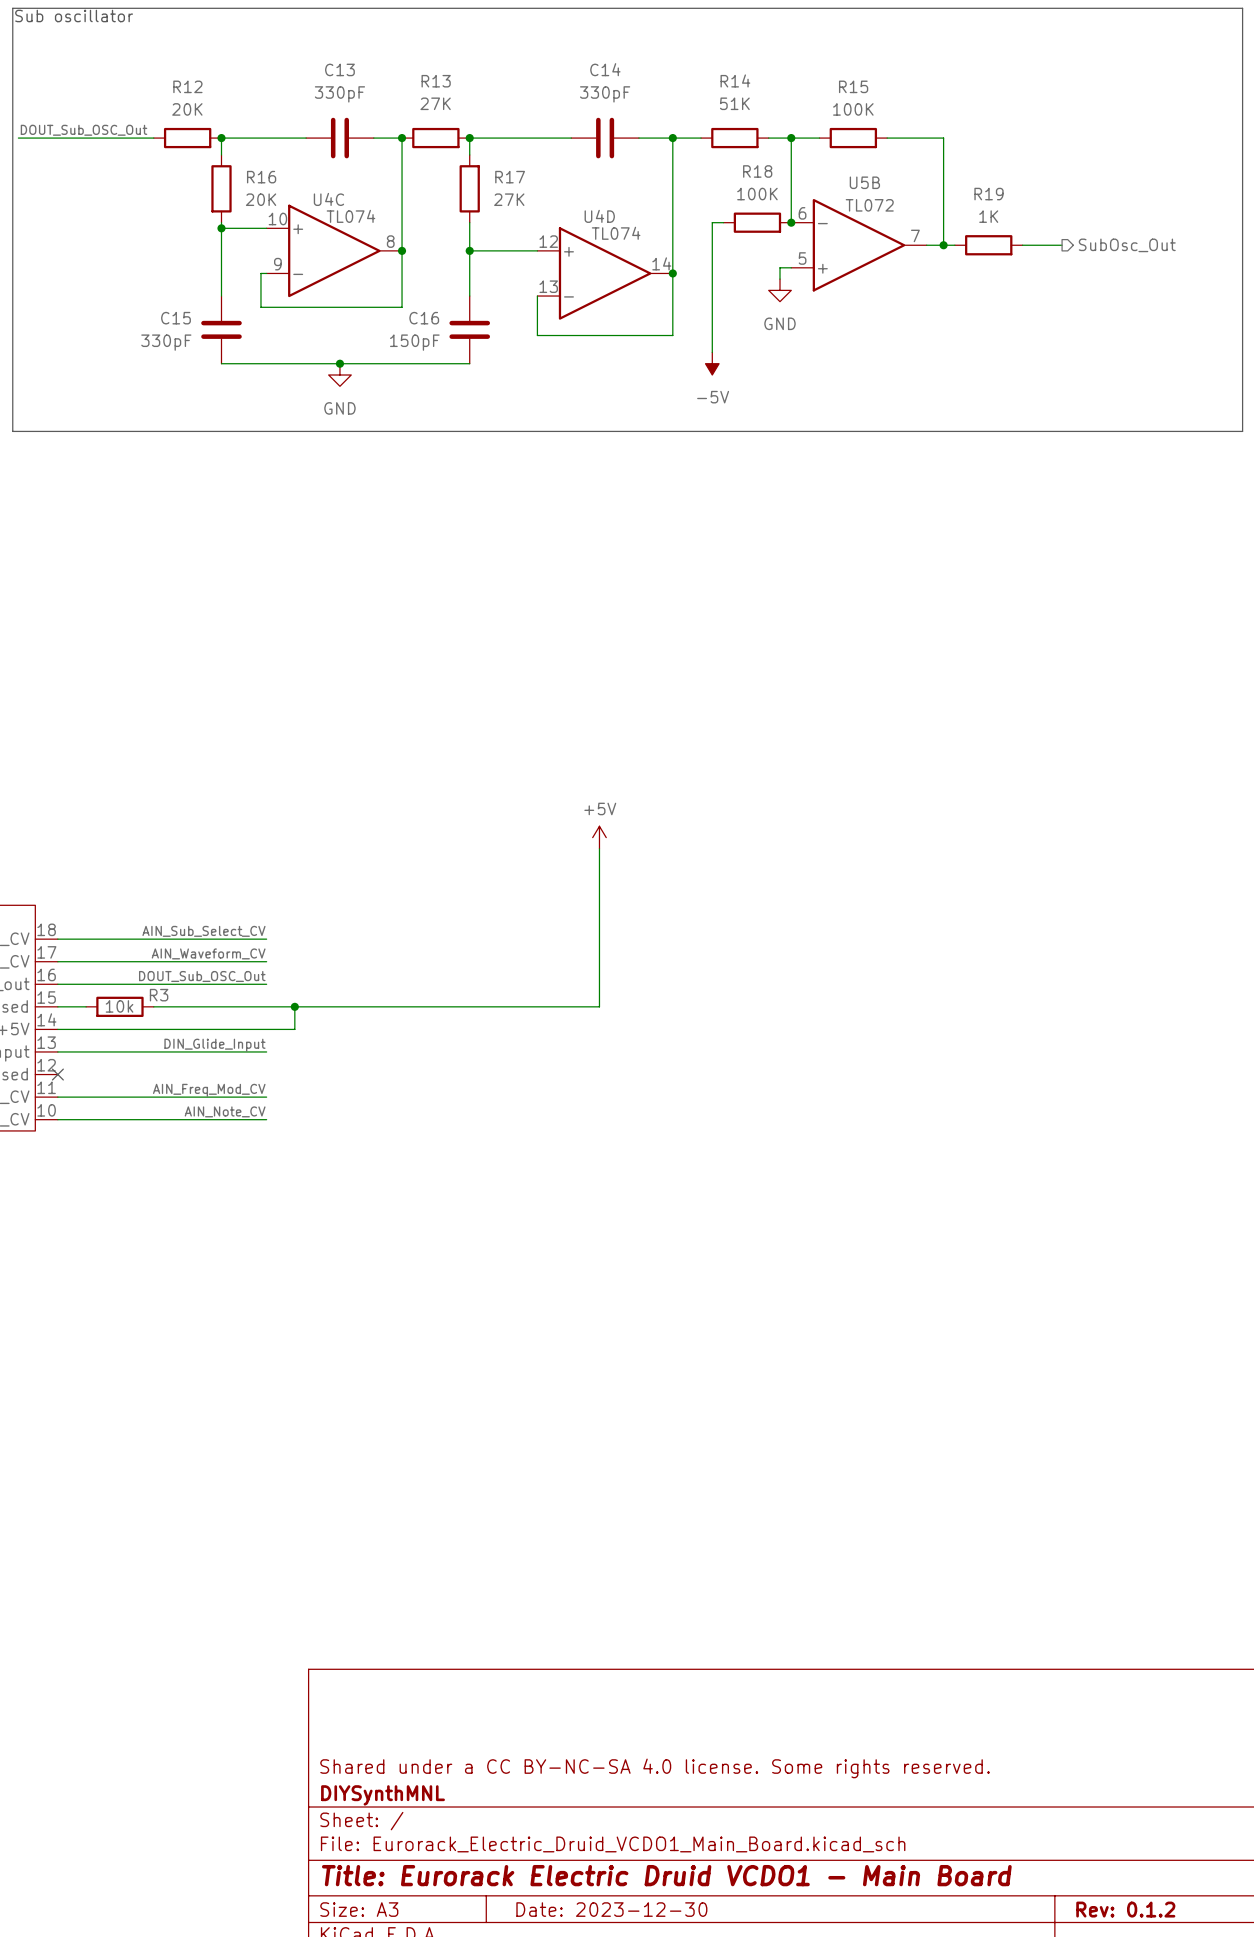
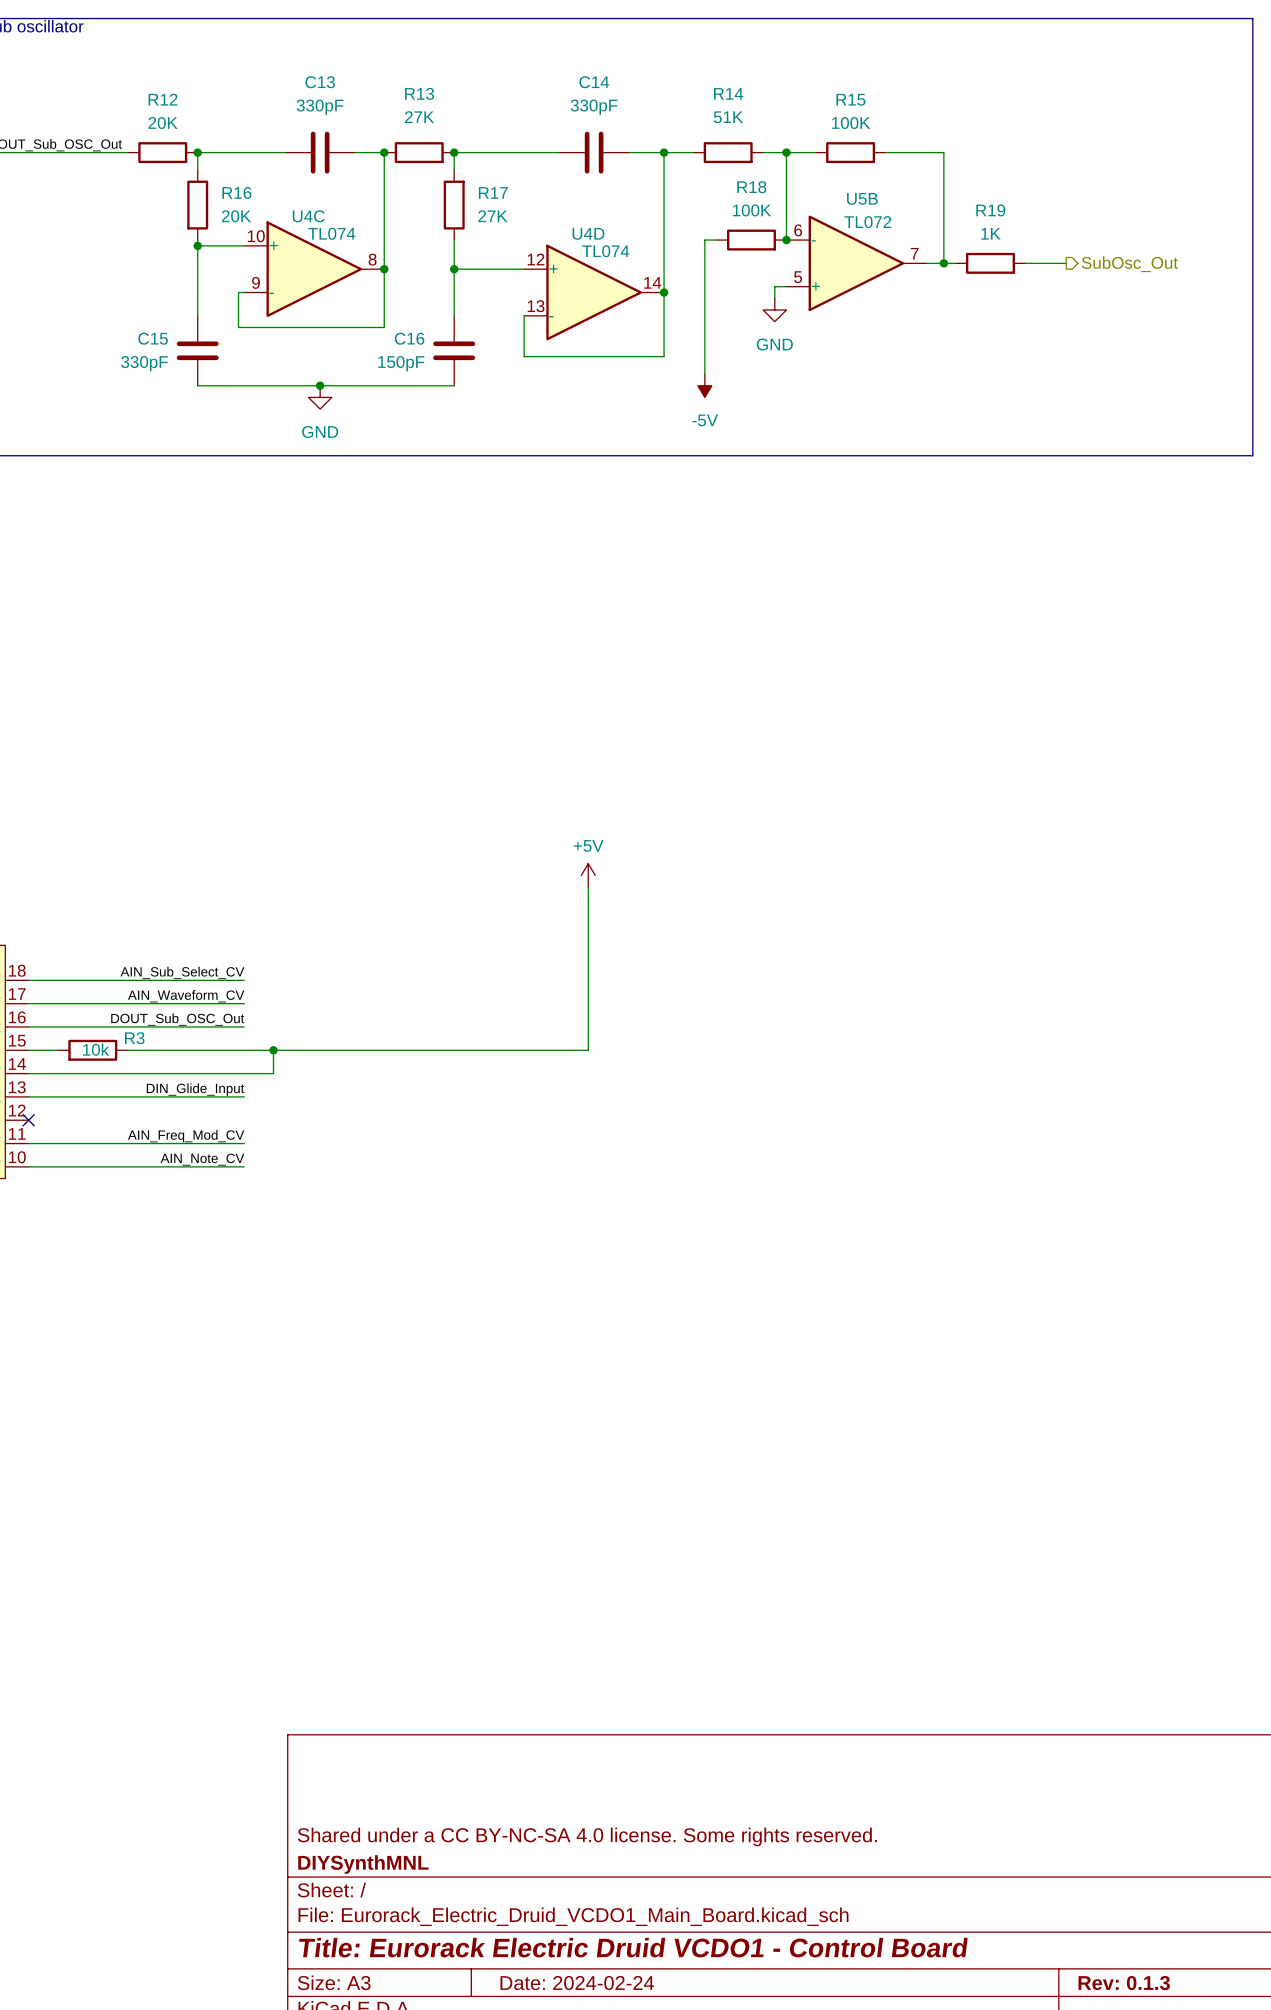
title block: Title: Eurorack Electric Druid VCDO1 - Main Board (666, 1875) -> Title: Eurorack Electric Druid VCDO1 - Control Board (633, 1947)
title block: Date: 2023-12-30 (611, 1909) -> Date: 2024-02-24 (577, 1983)
title block: Rev: 0.1.2 (1125, 1909) -> Rev: 0.1.3 (1124, 1983)

